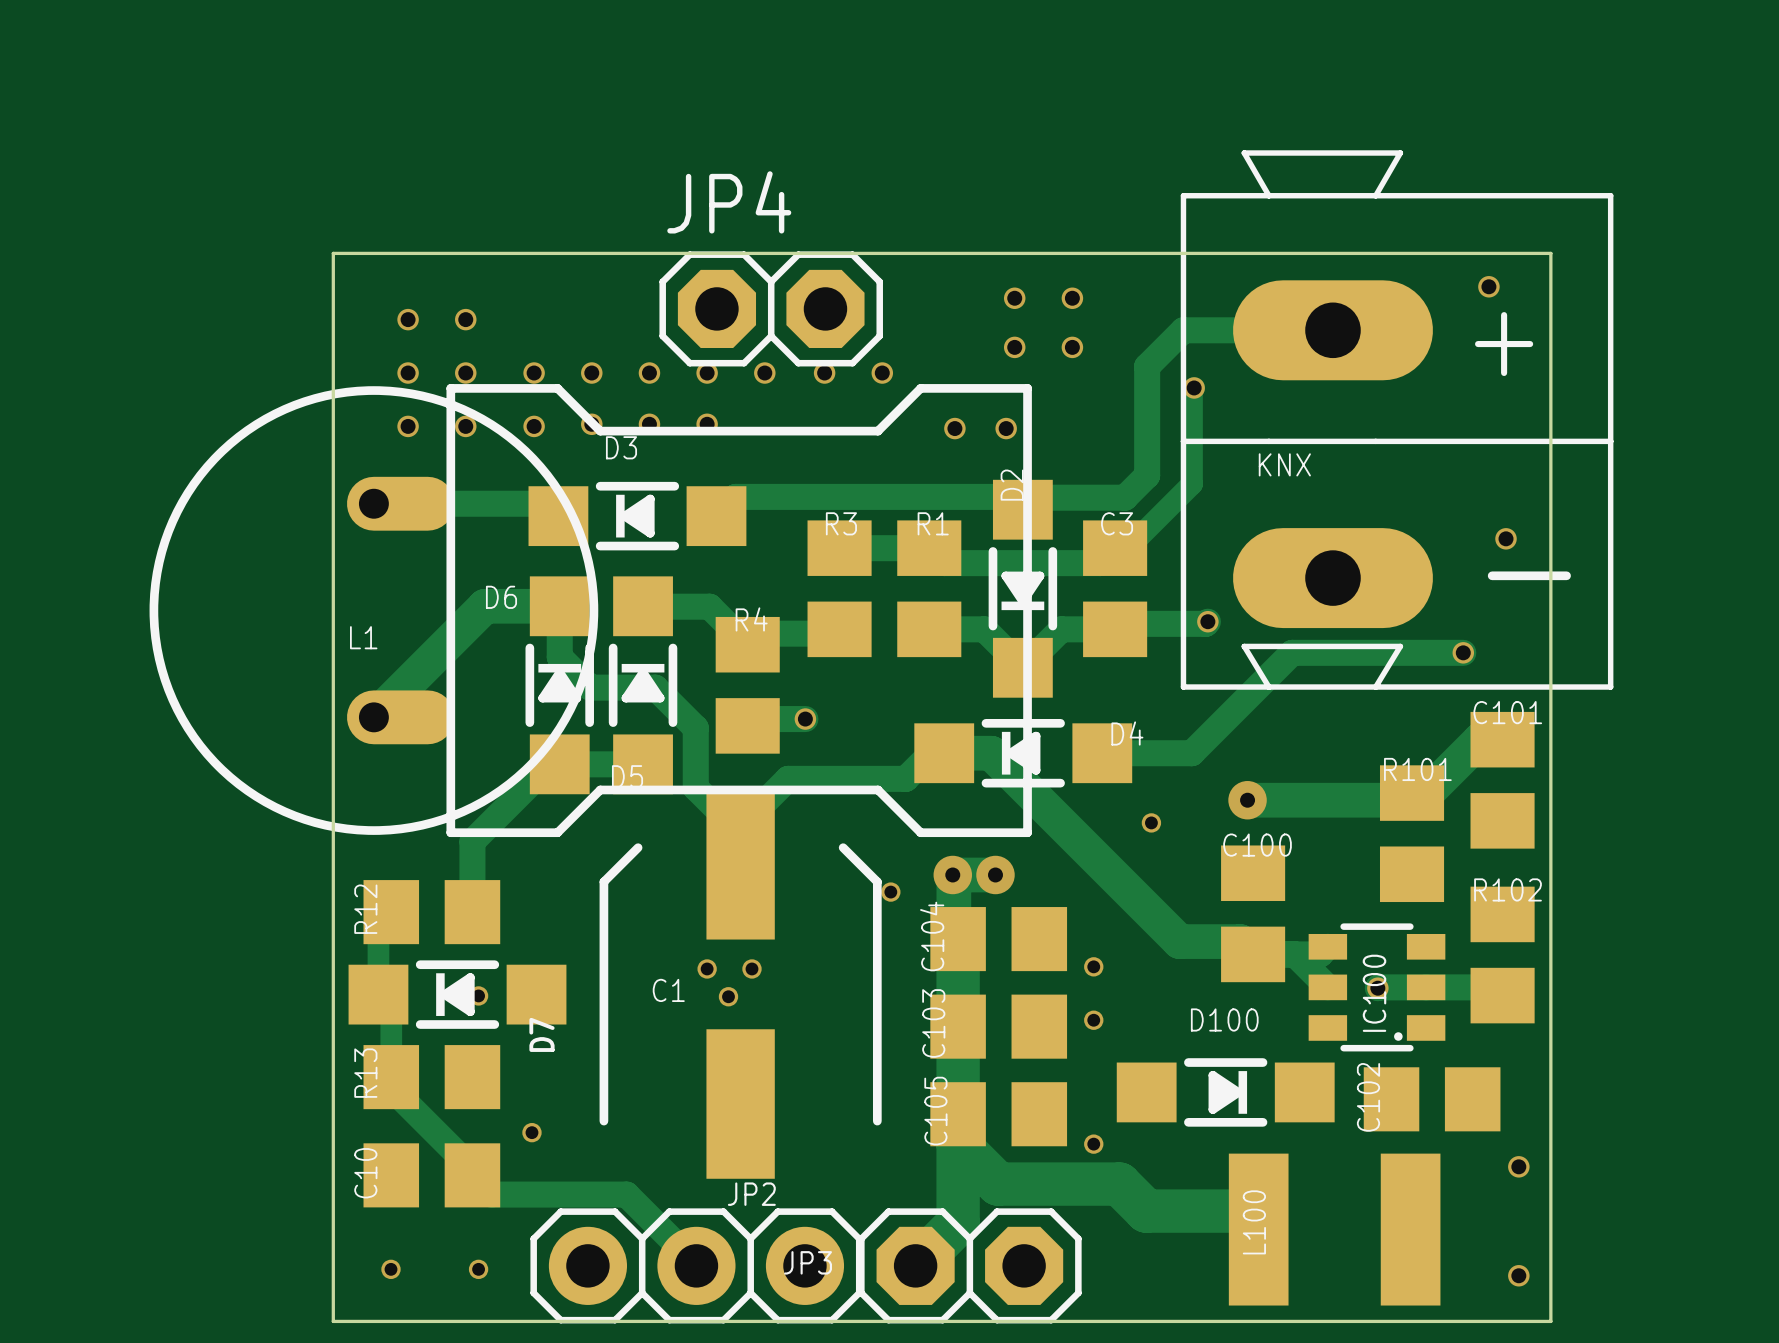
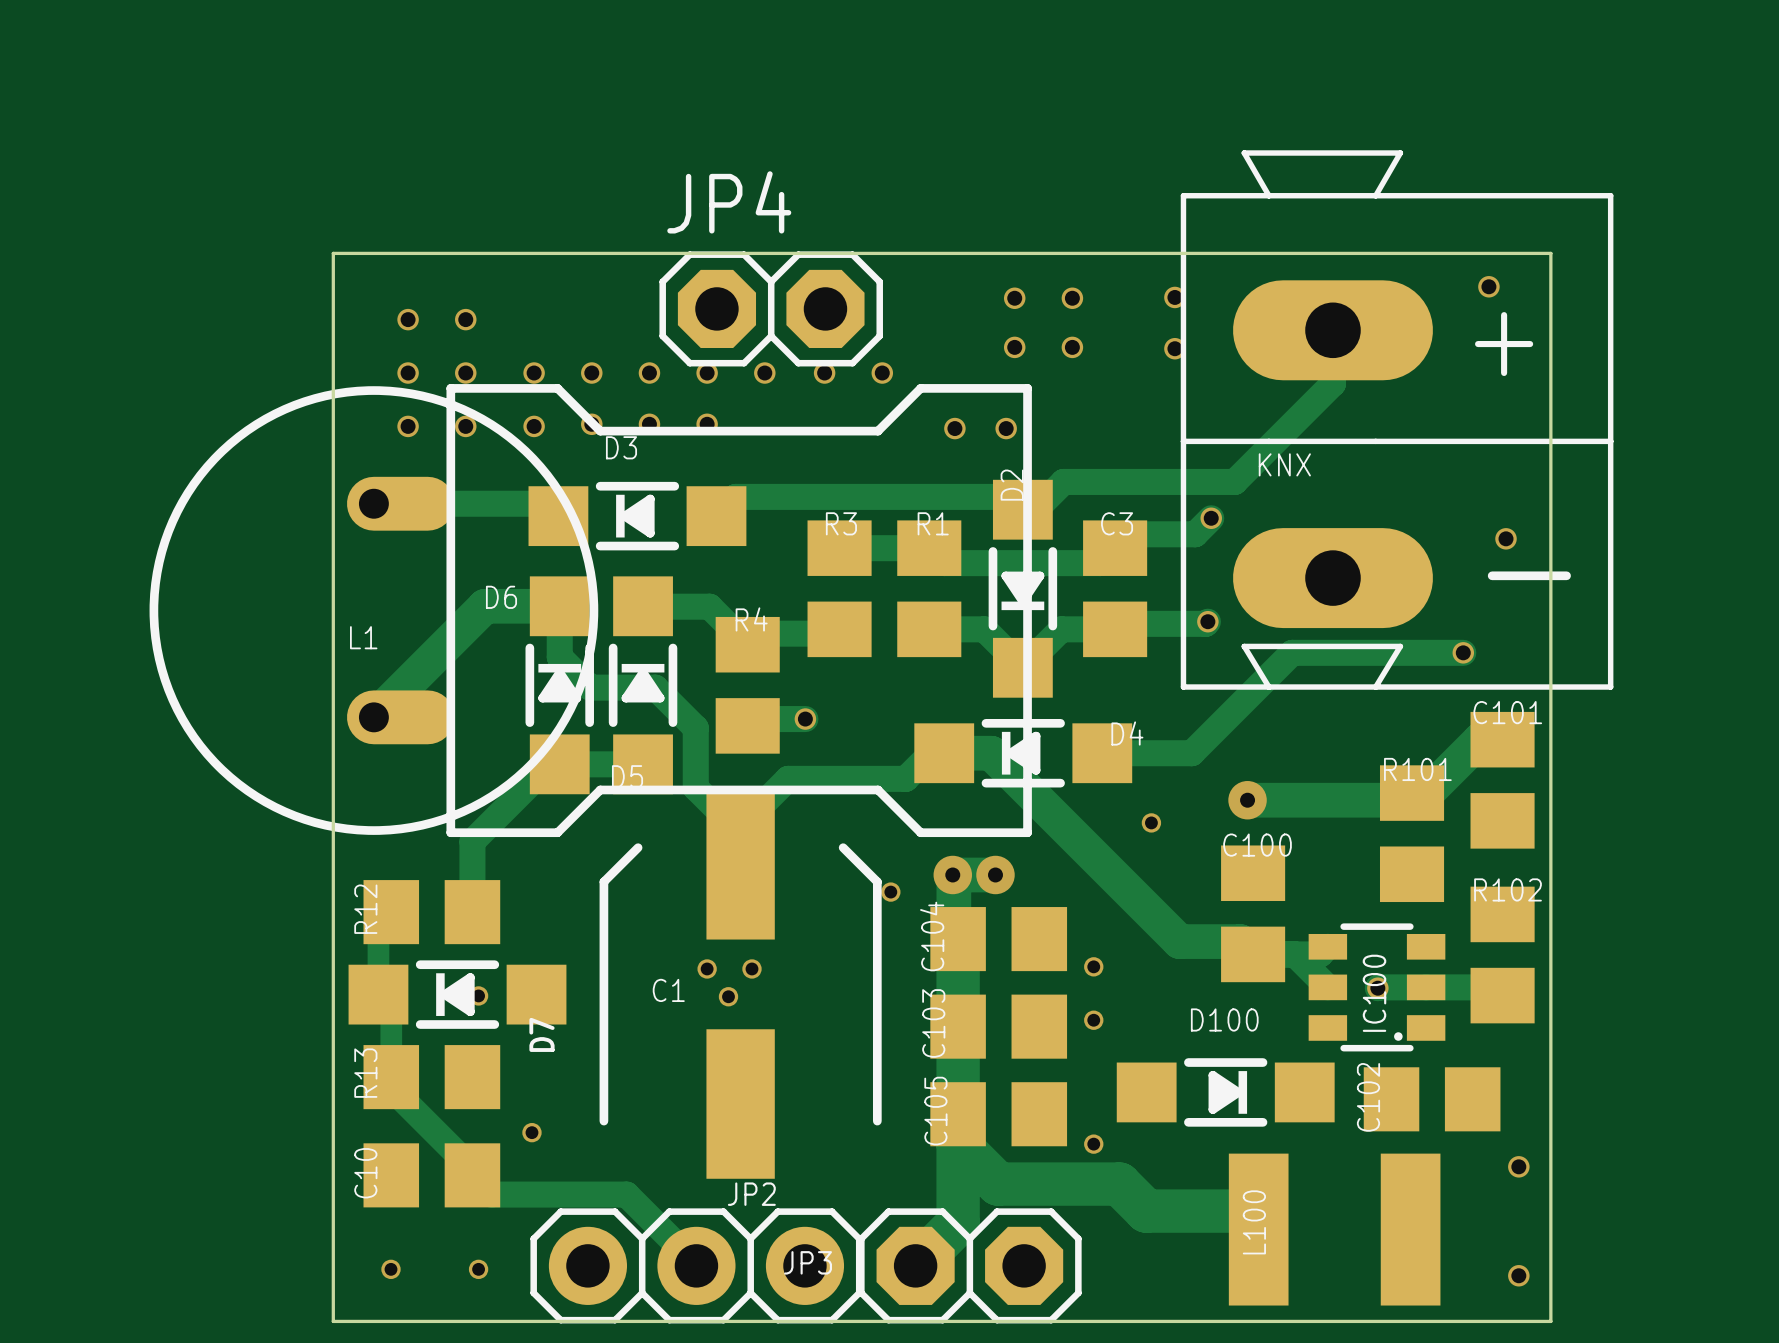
via: none -> (1174, 297)
track: (1332, 330) (1183, 330) (1147, 366) (1147, 475) (1125, 497) (1037, 497) (1025, 509) -> (1332, 330) (1332, 383) (1234, 481) (1063, 481) (1035, 509) (1025, 509)
track: (1194, 387) (1192, 390) (1192, 484) (1127, 548) (1115, 548) -> (1211, 518) (1195, 534) (1129, 534) (1115, 548)
via position: (1194, 387) -> (1174, 348)
via: none -> (1211, 518)

